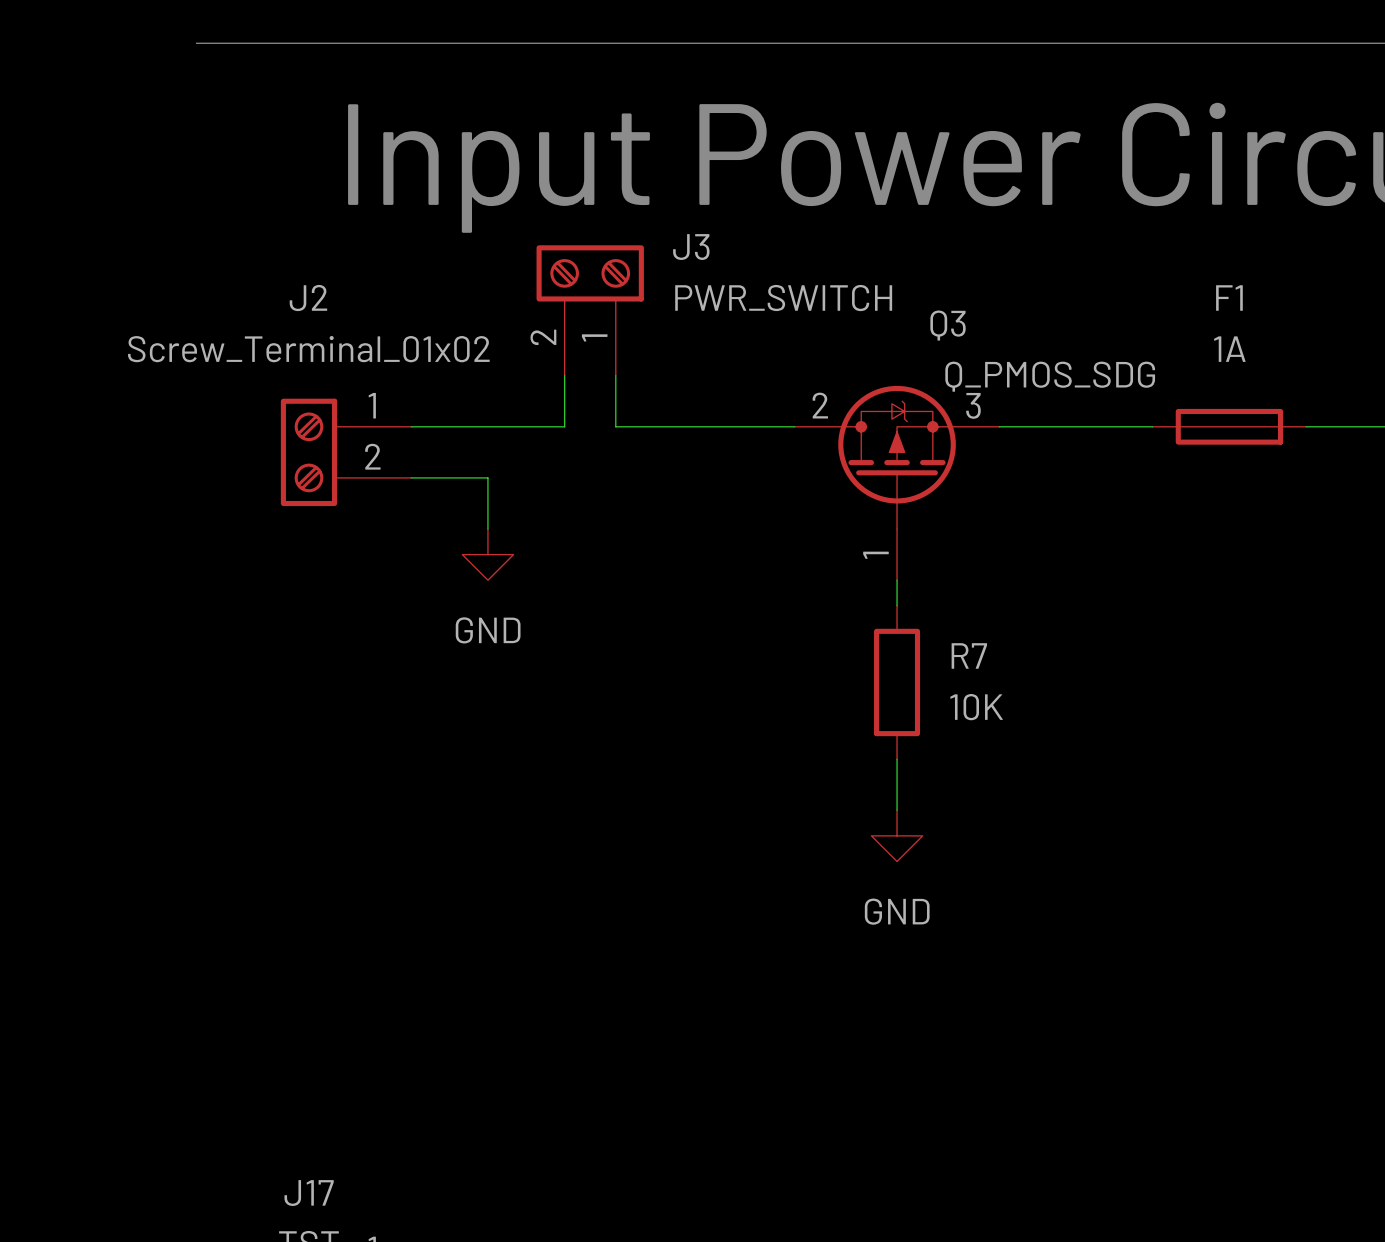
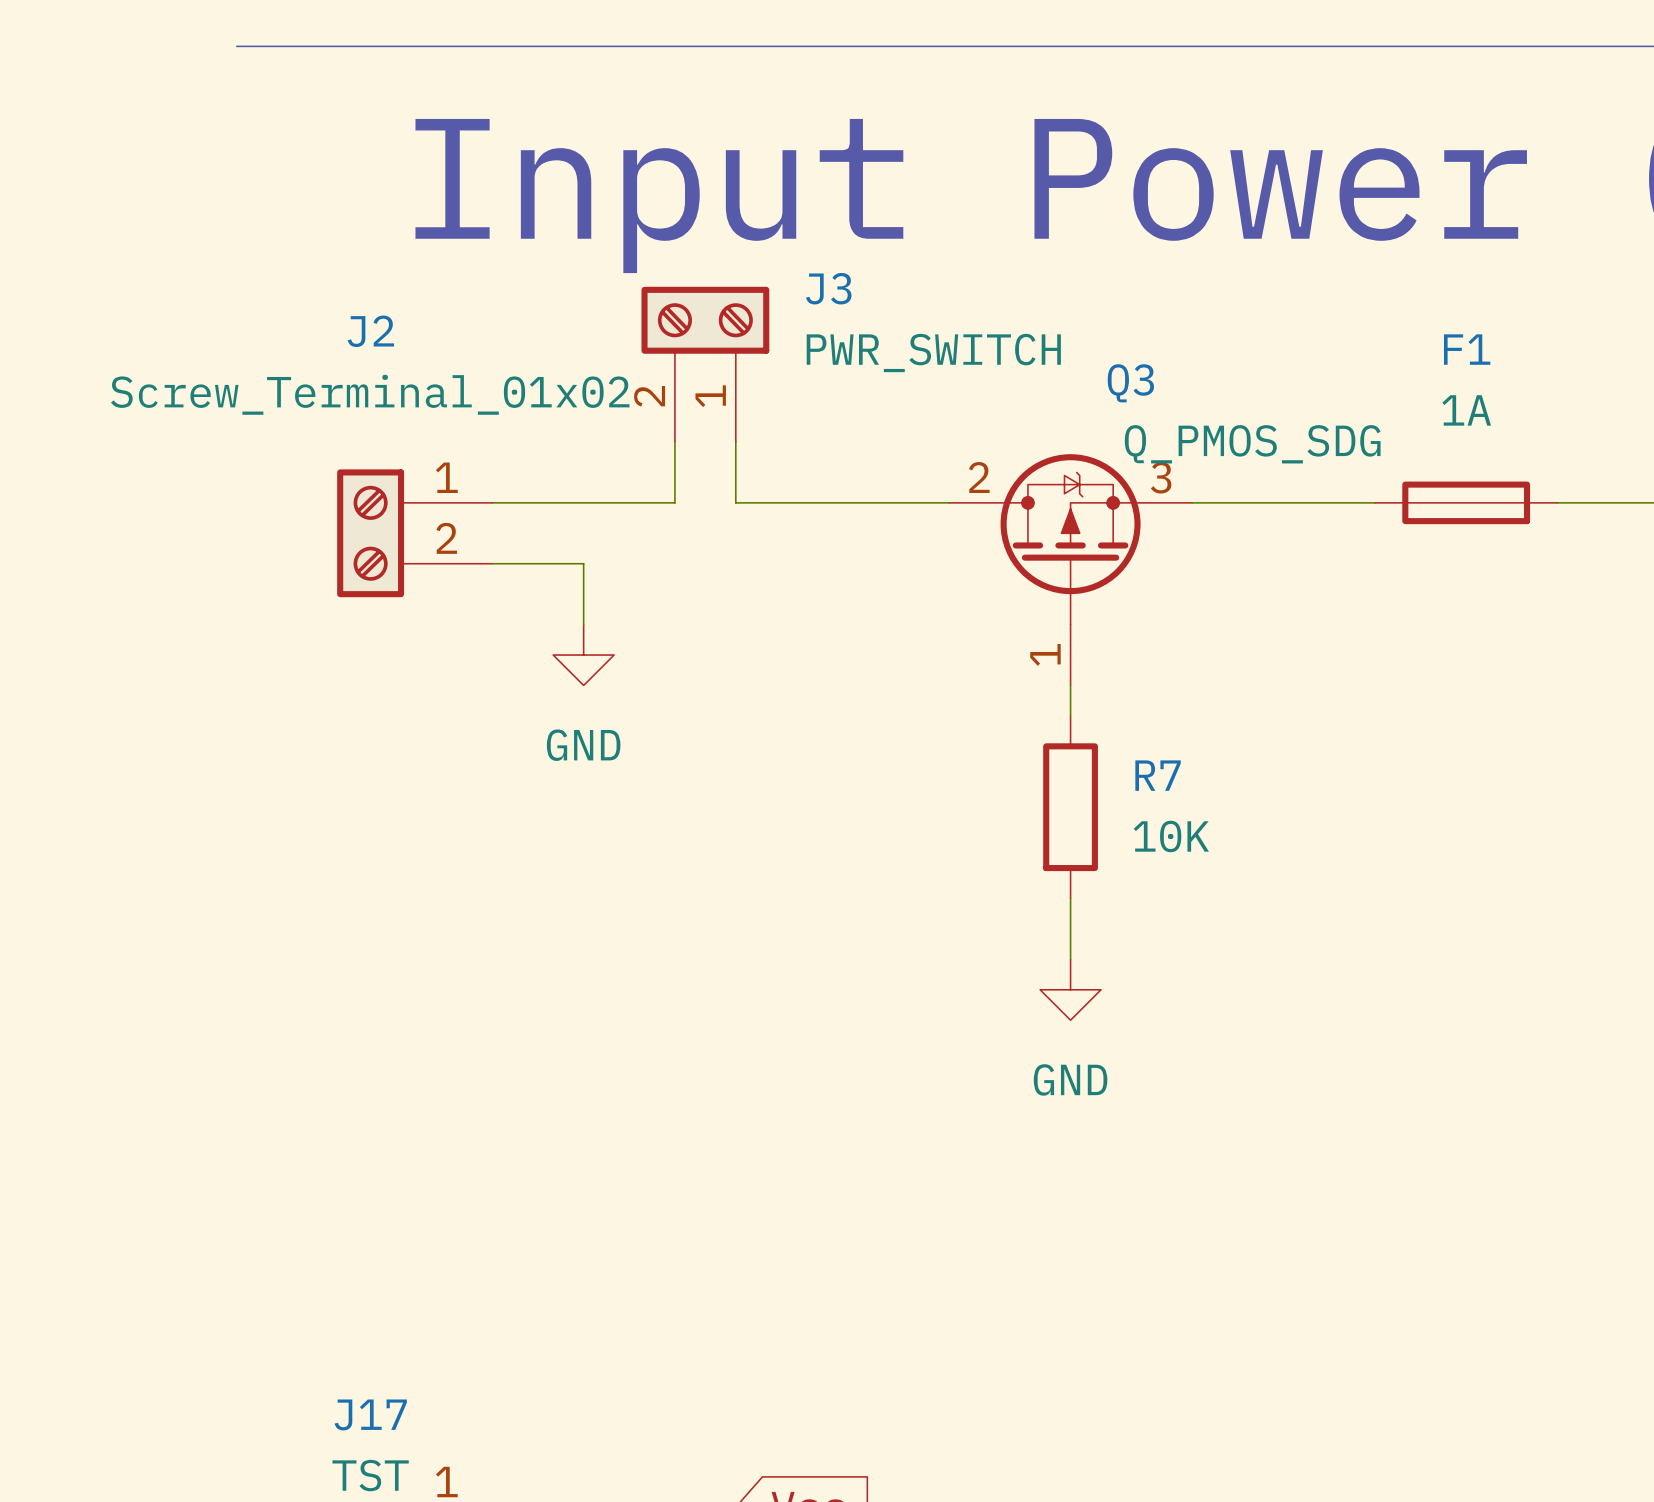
J2 name position: J2 (308, 298) -> J2 (370, 331)
J2 value position: Screw_Terminal_01x02 (308, 349) -> Screw_Terminal_01x02 (370, 394)

